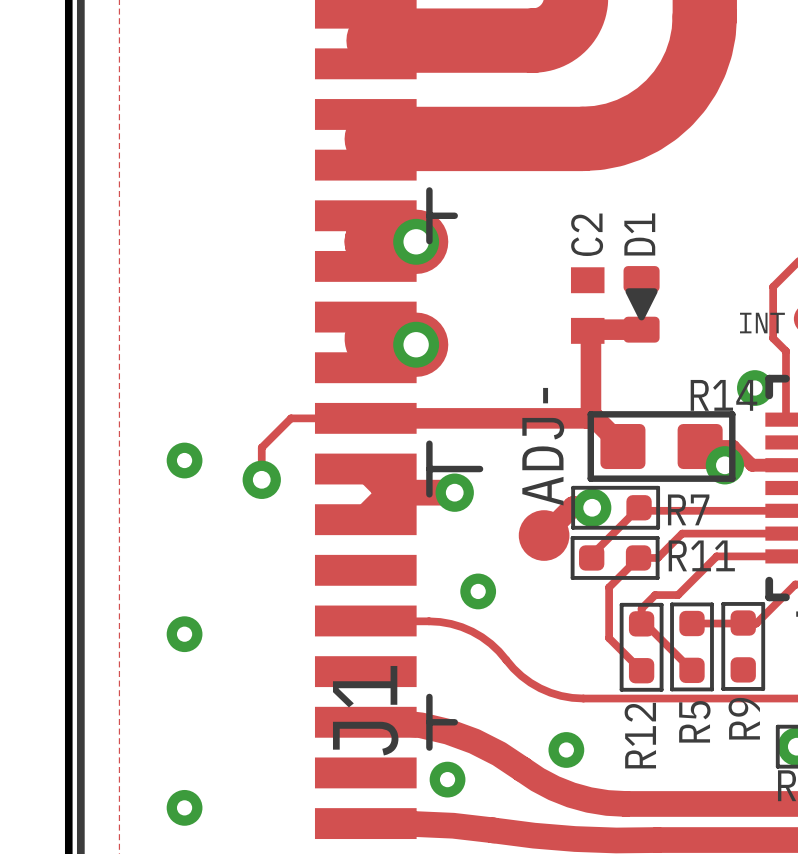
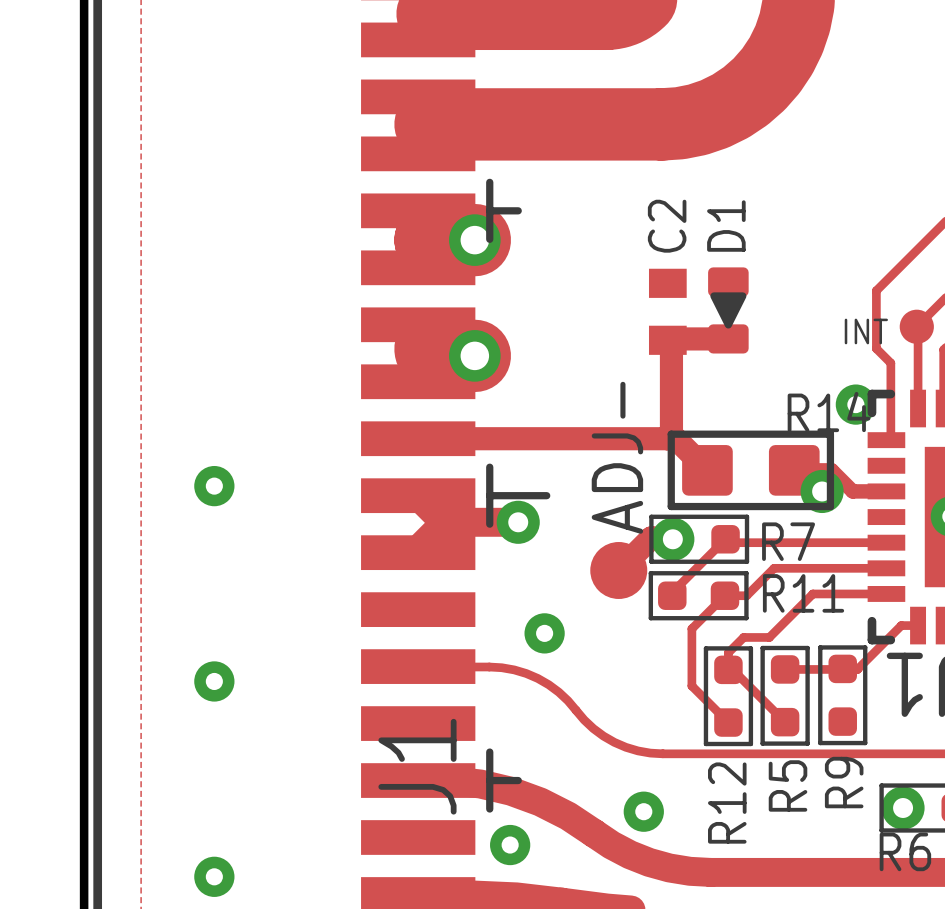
track: (365, 418) (291, 418) (261, 447) (261, 479) -> none
via: (261, 479) -> none

